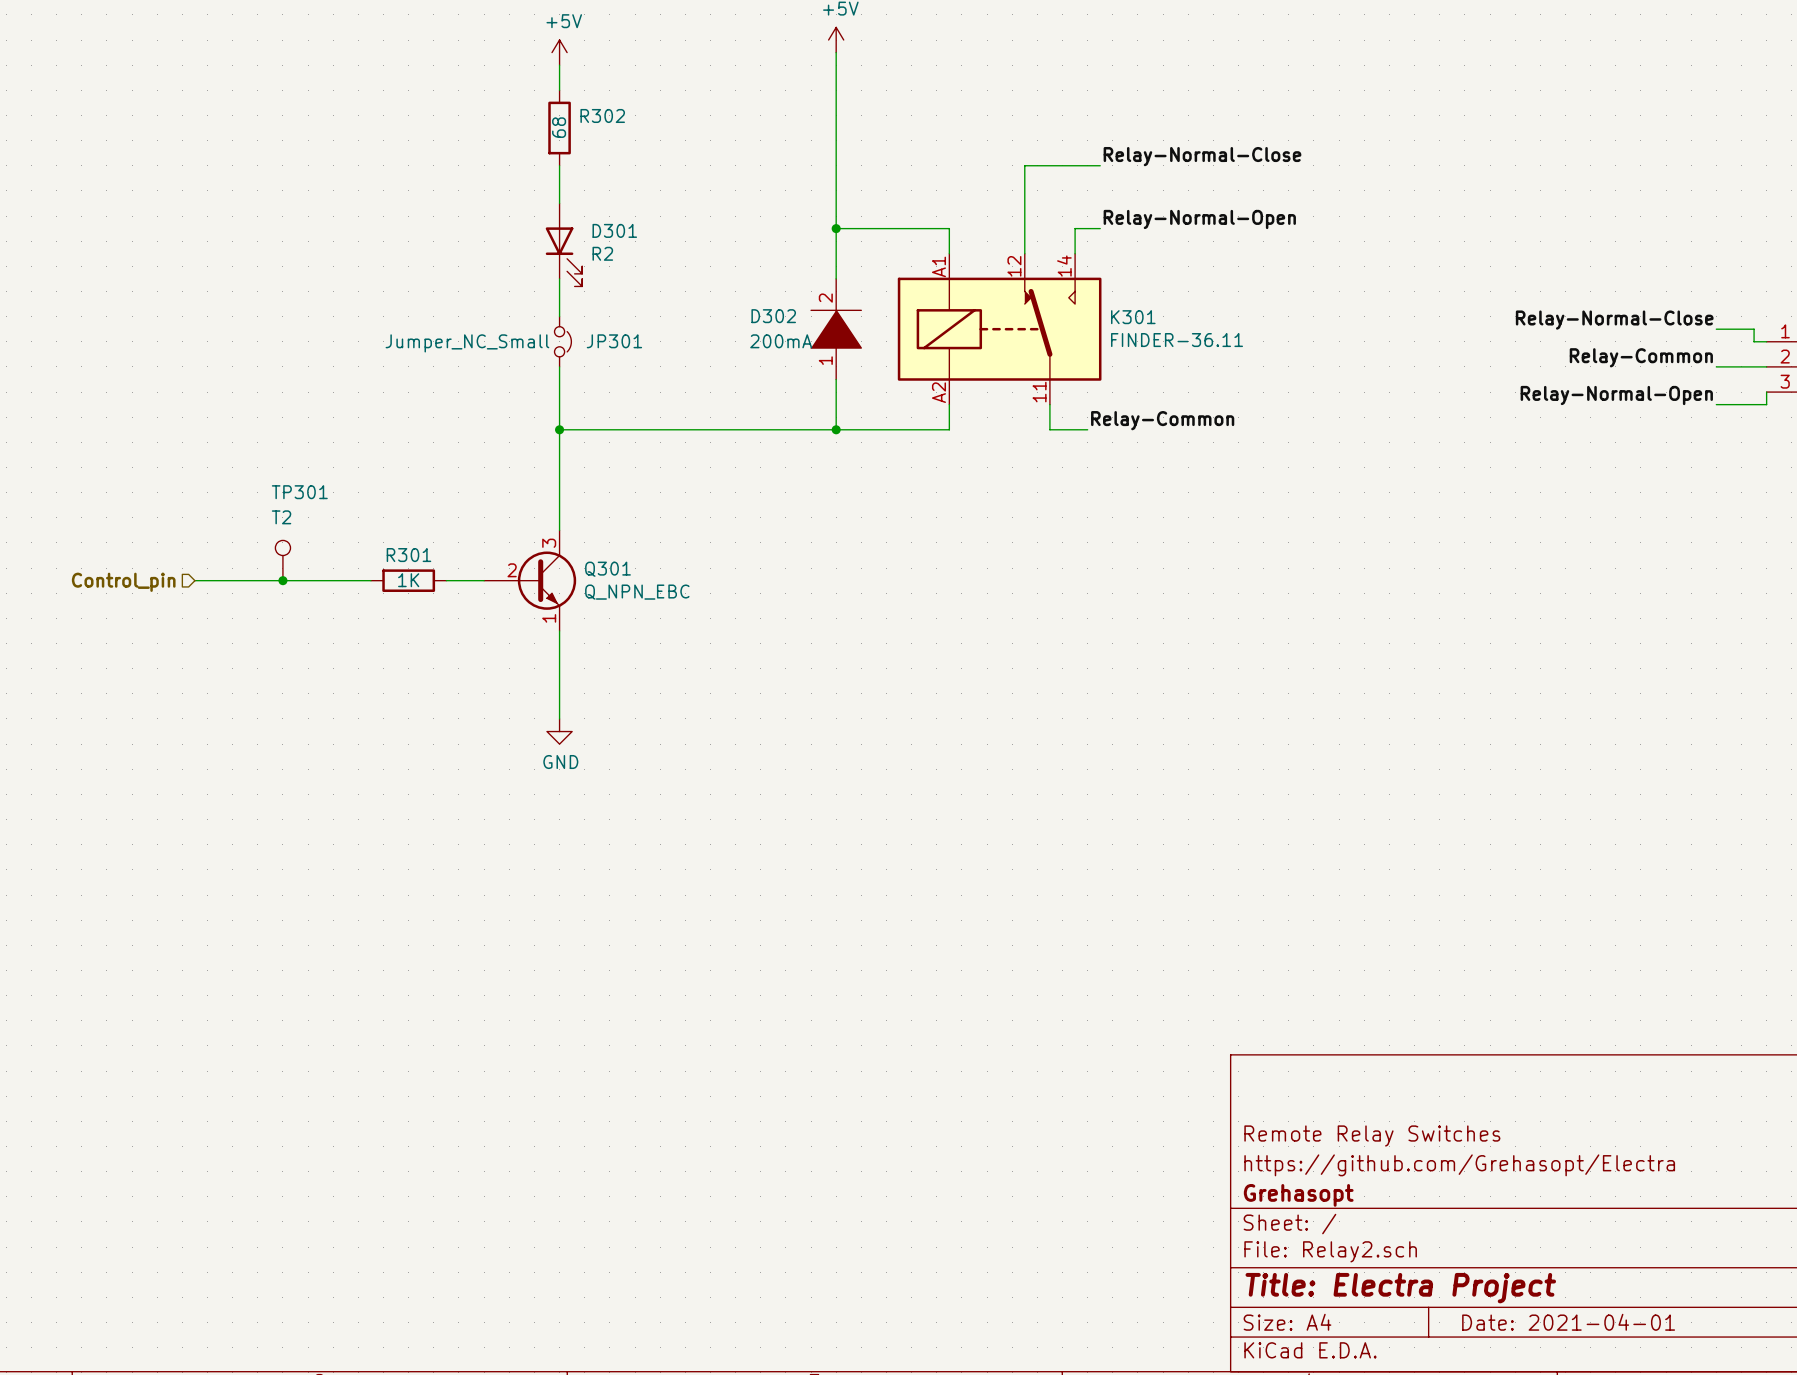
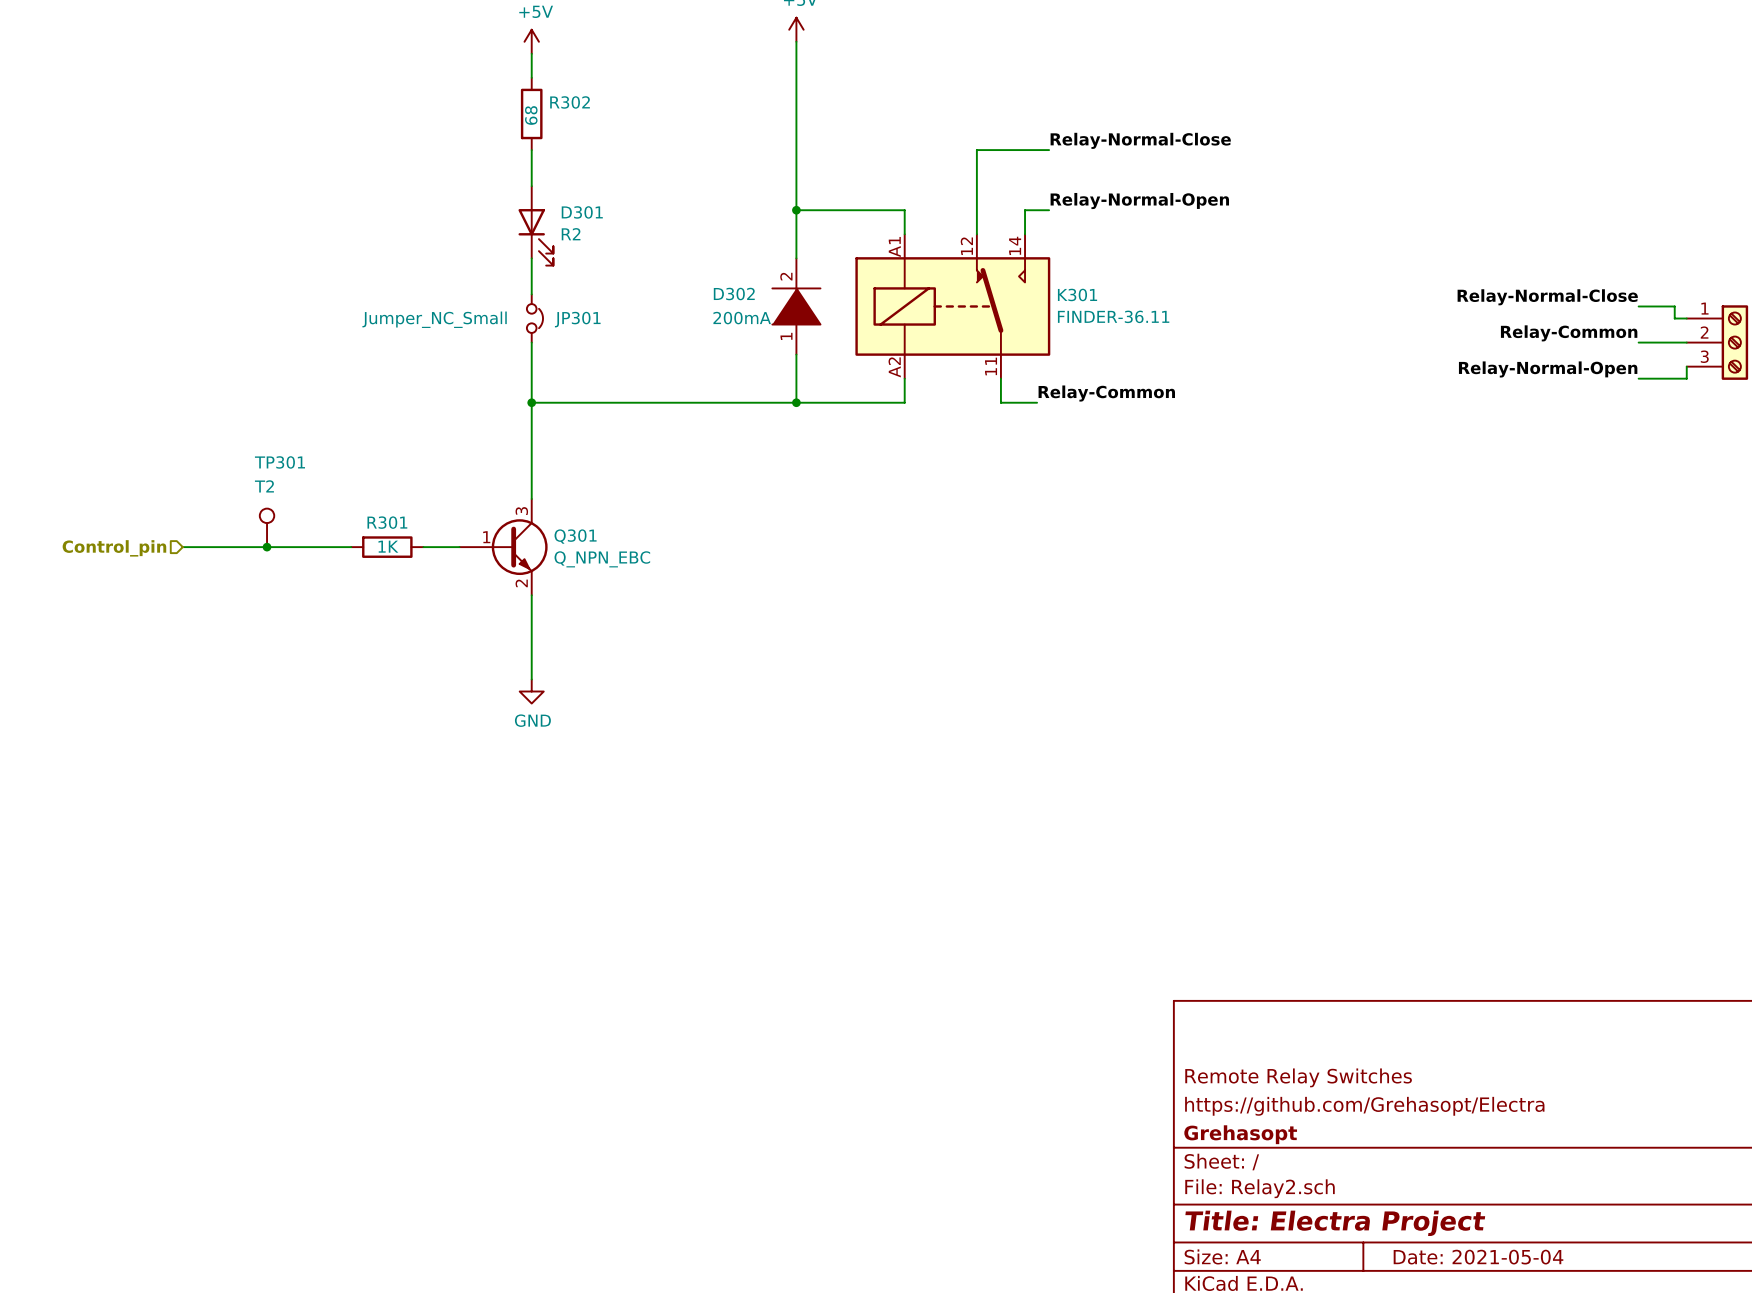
Q301 pin number: 2 (512, 570) -> 1 (486, 537)
Q301 pin number: 1 (549, 618) -> 2 (521, 583)
title block: Date: 2021-04-01 (1568, 1322) -> Date: 2021-05-04 (1478, 1257)

